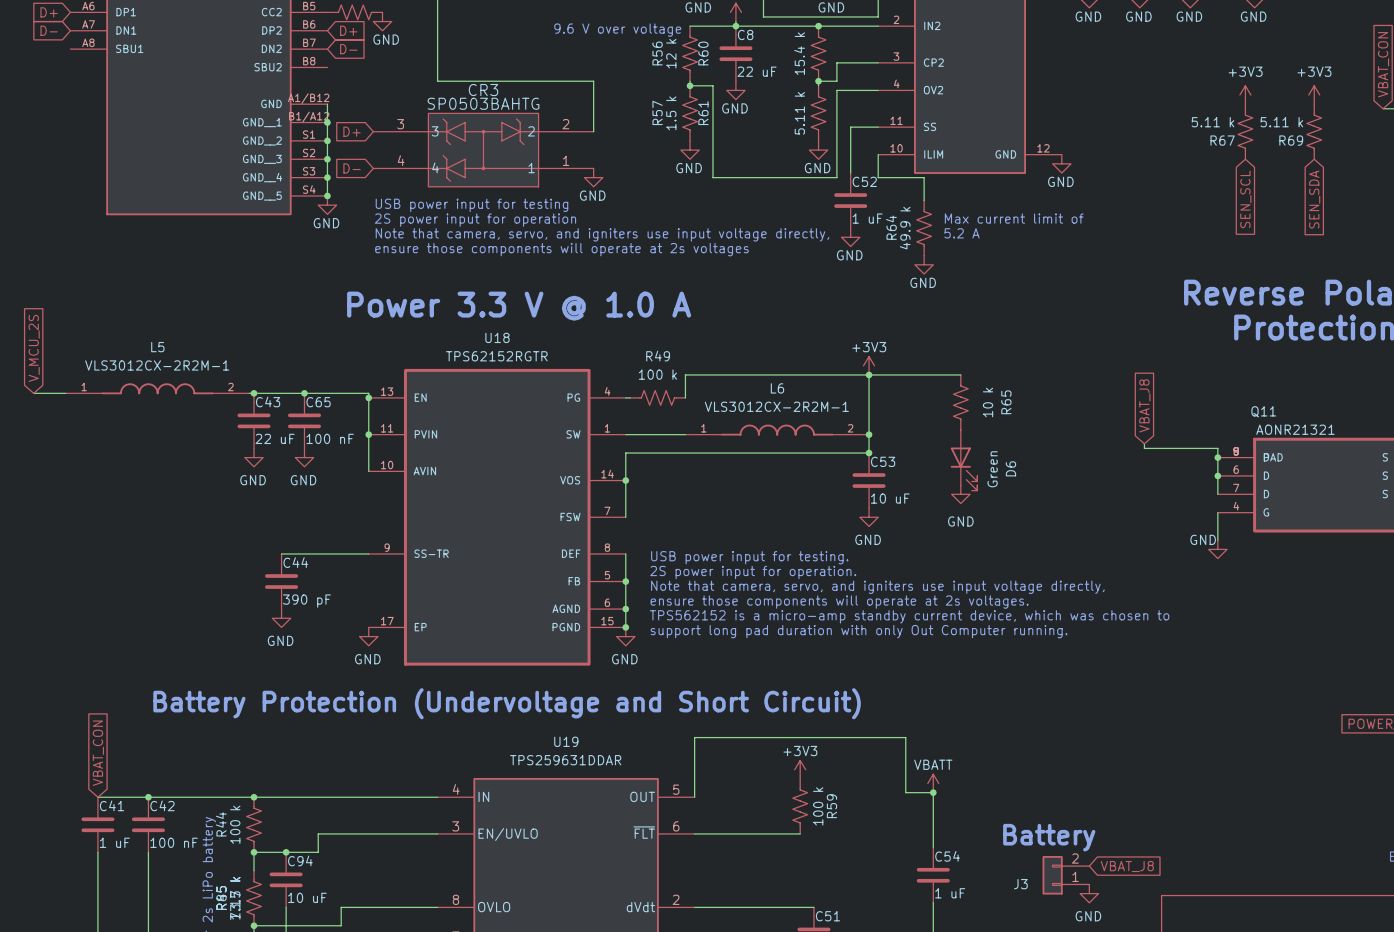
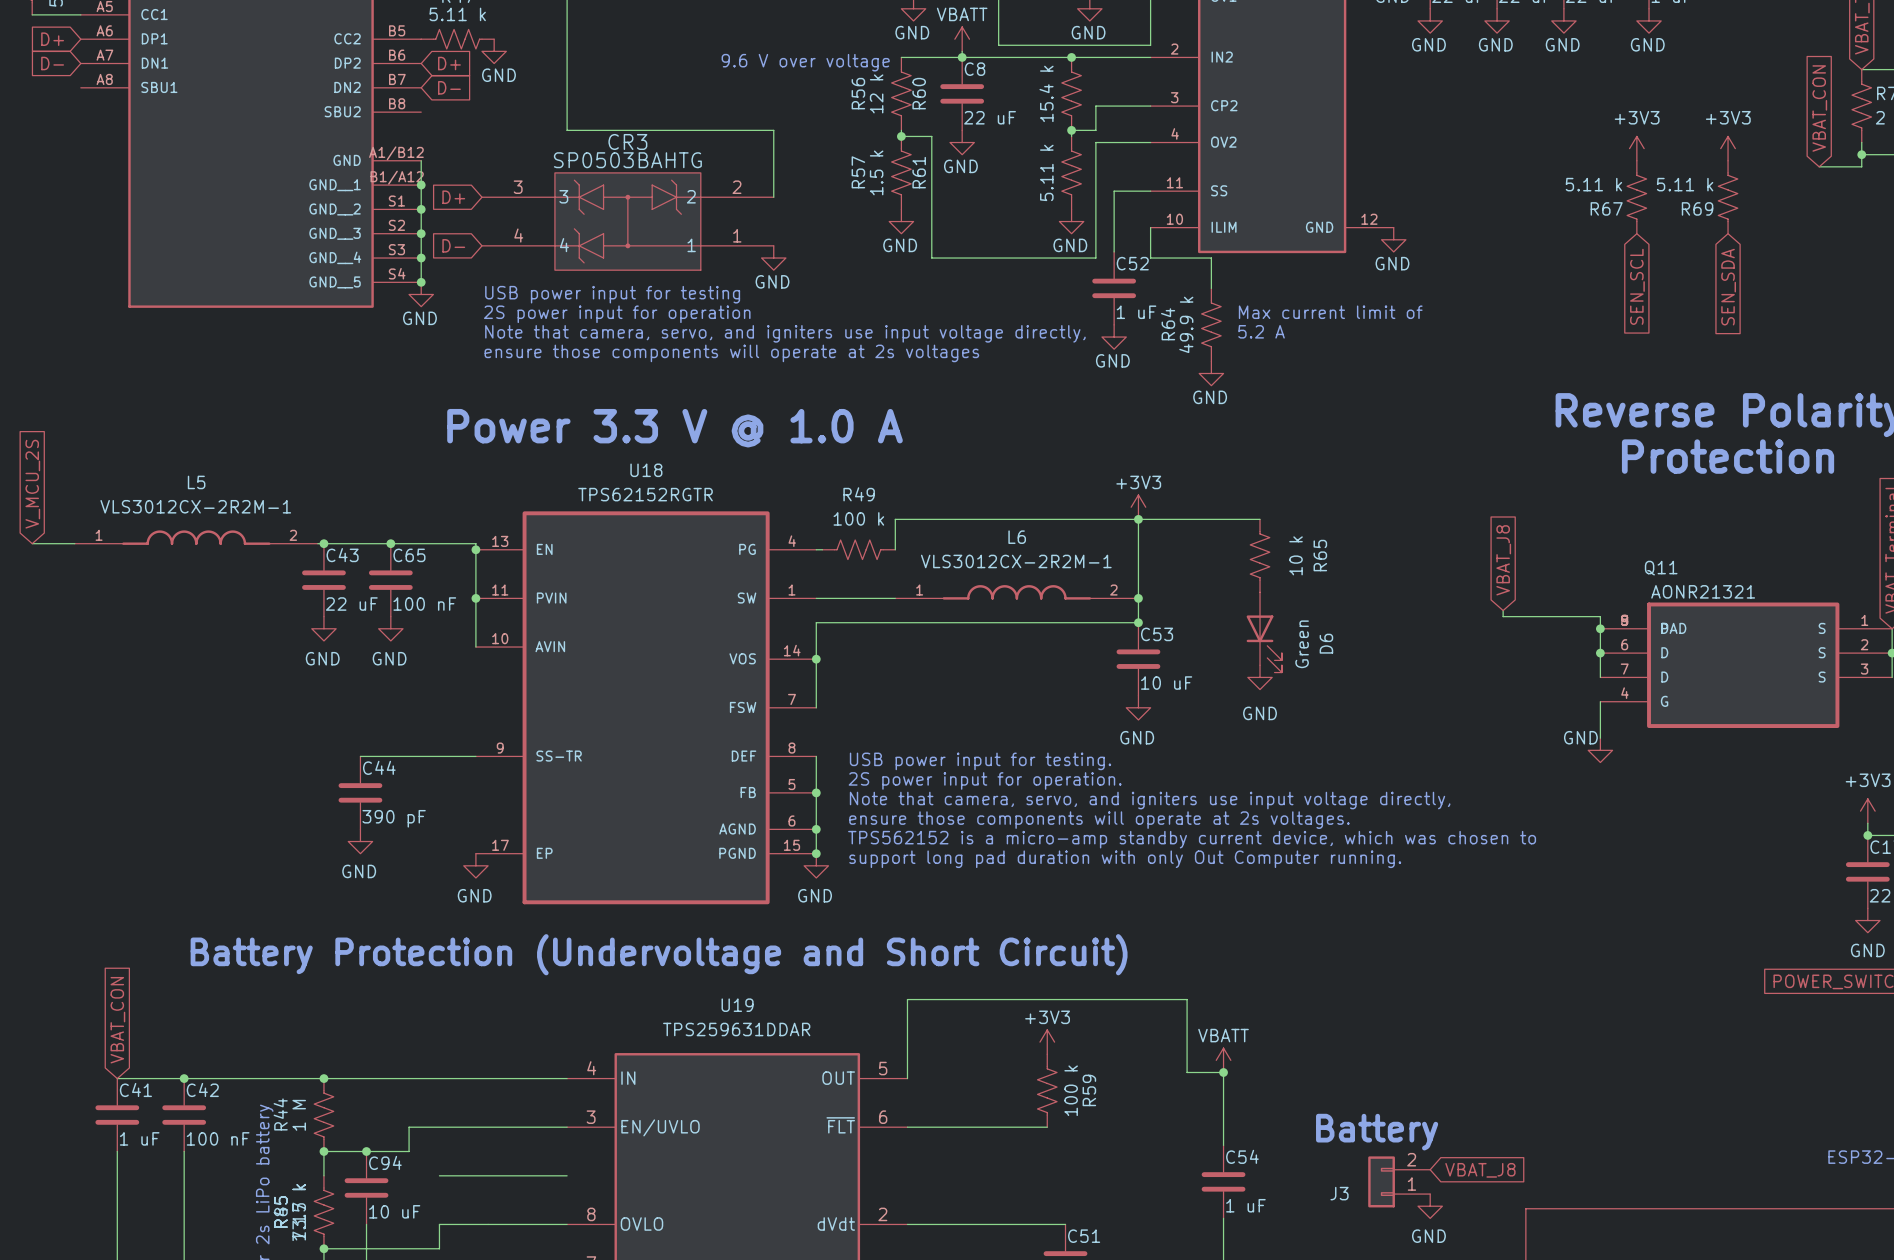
R44 value: 100 k (235, 824) -> 1 M (299, 1115)
wire: none -> (439, 1175) (567, 1175)

